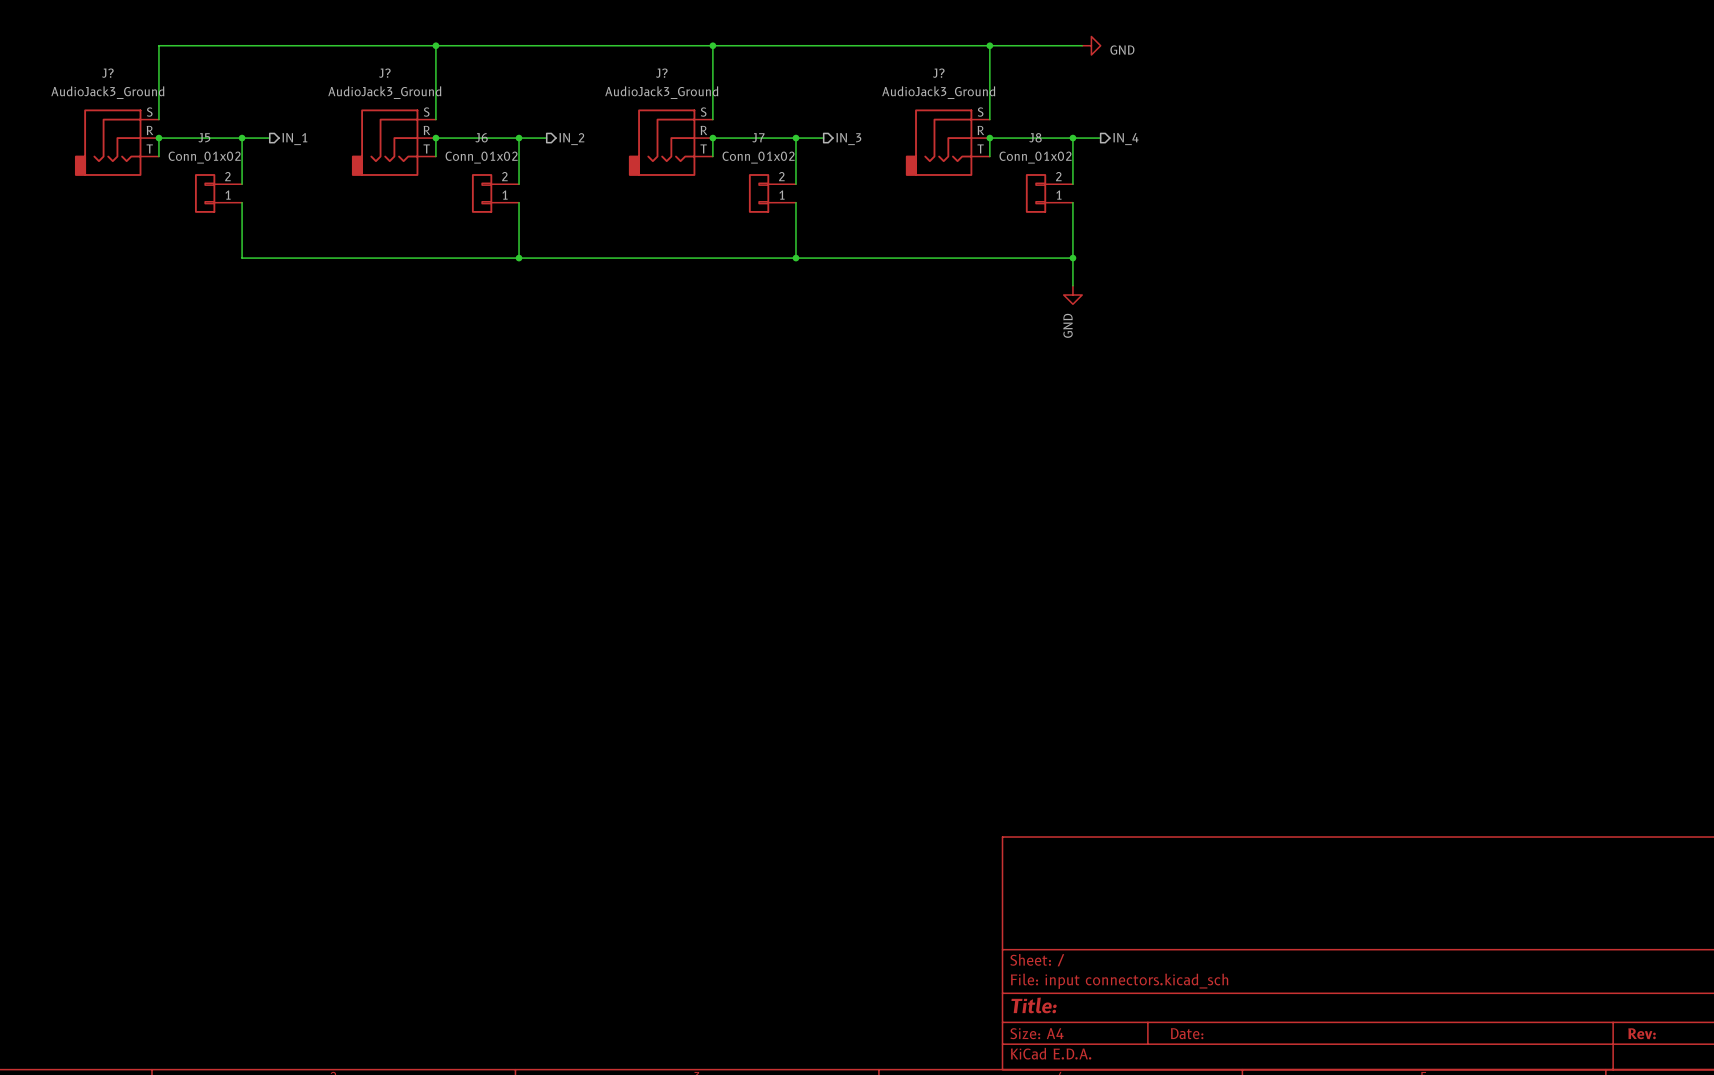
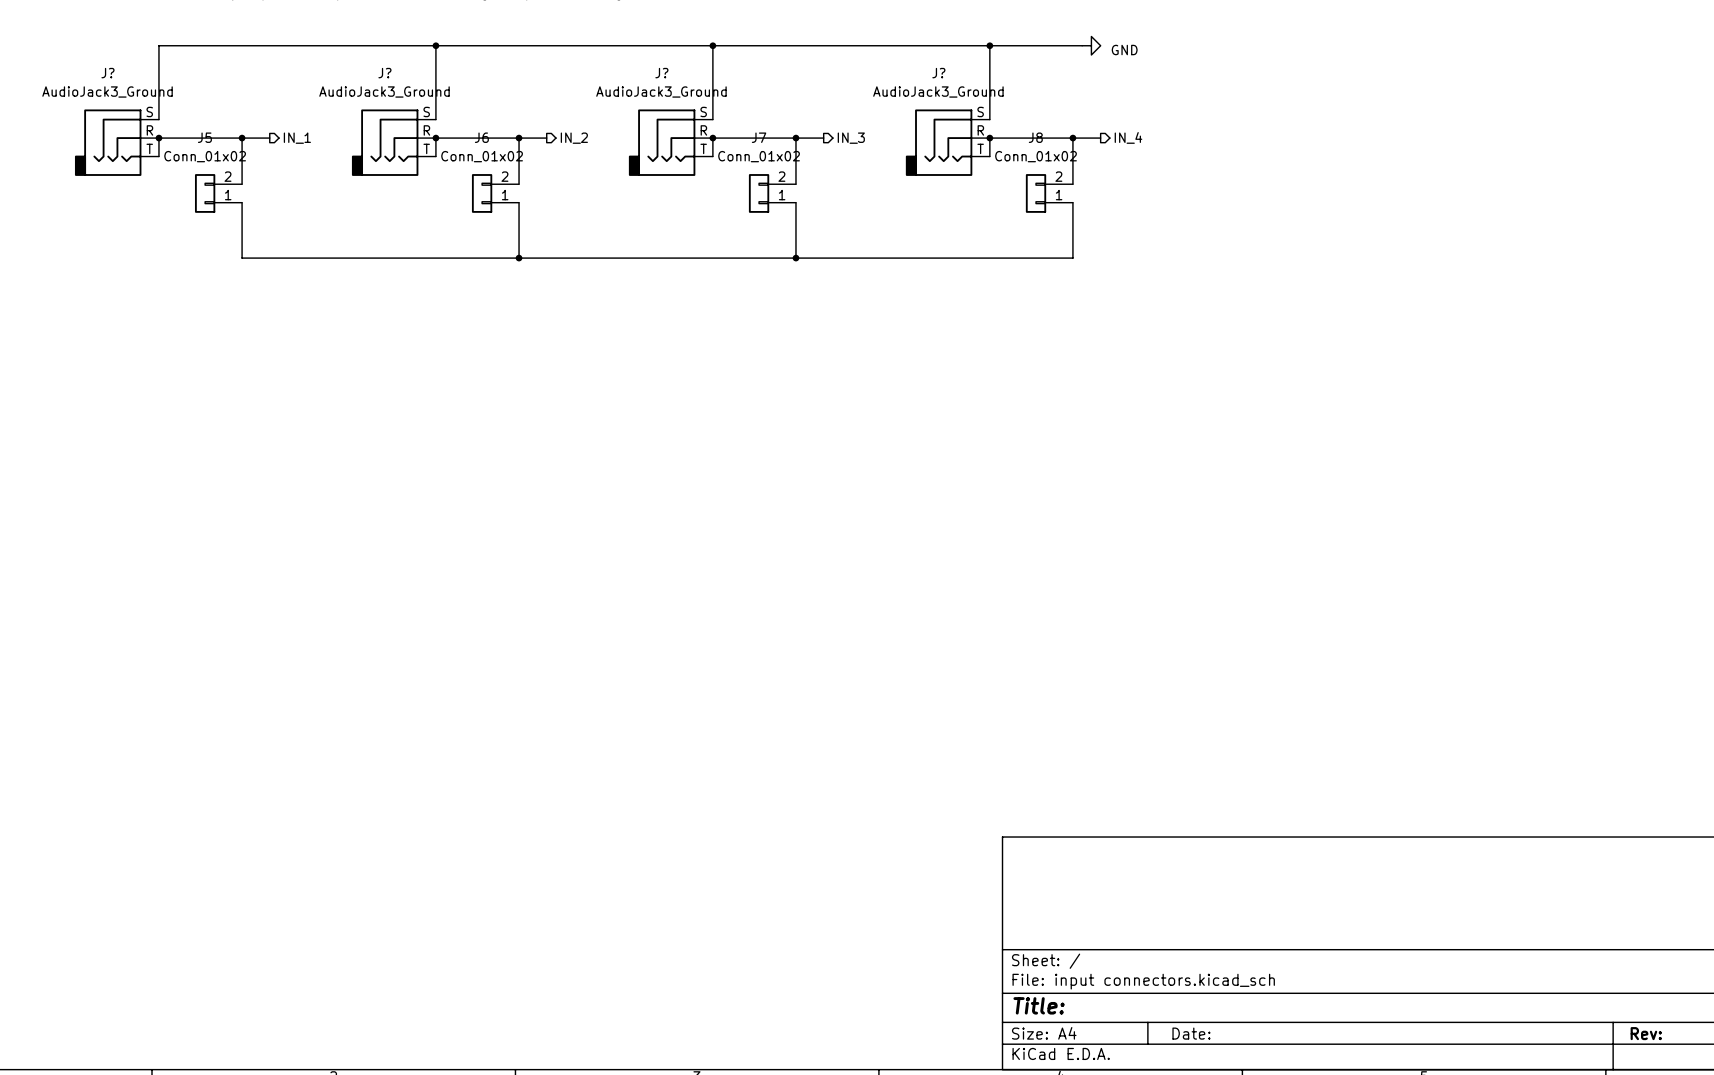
wire: (1072, 258) (1072, 285) -> none
junction: (1072, 258) -> none
power symbol: GND (1072, 295) -> none

